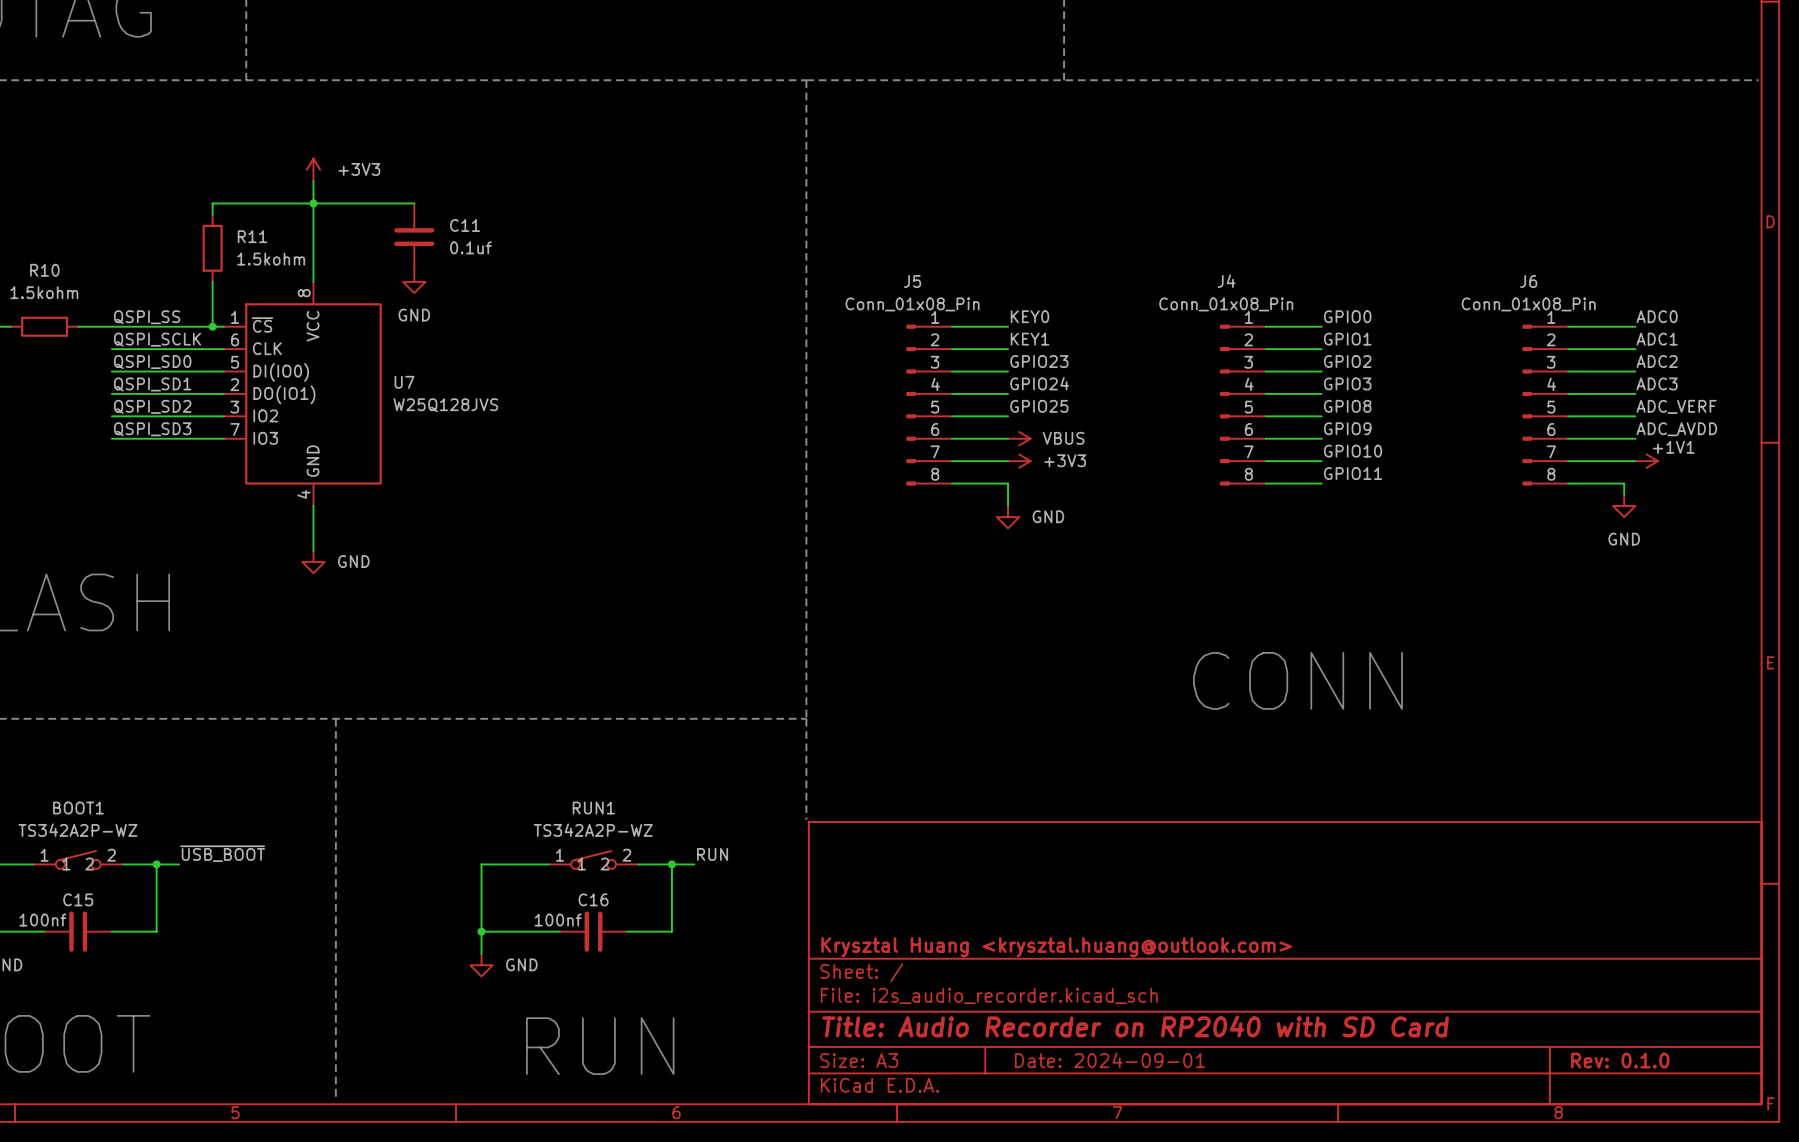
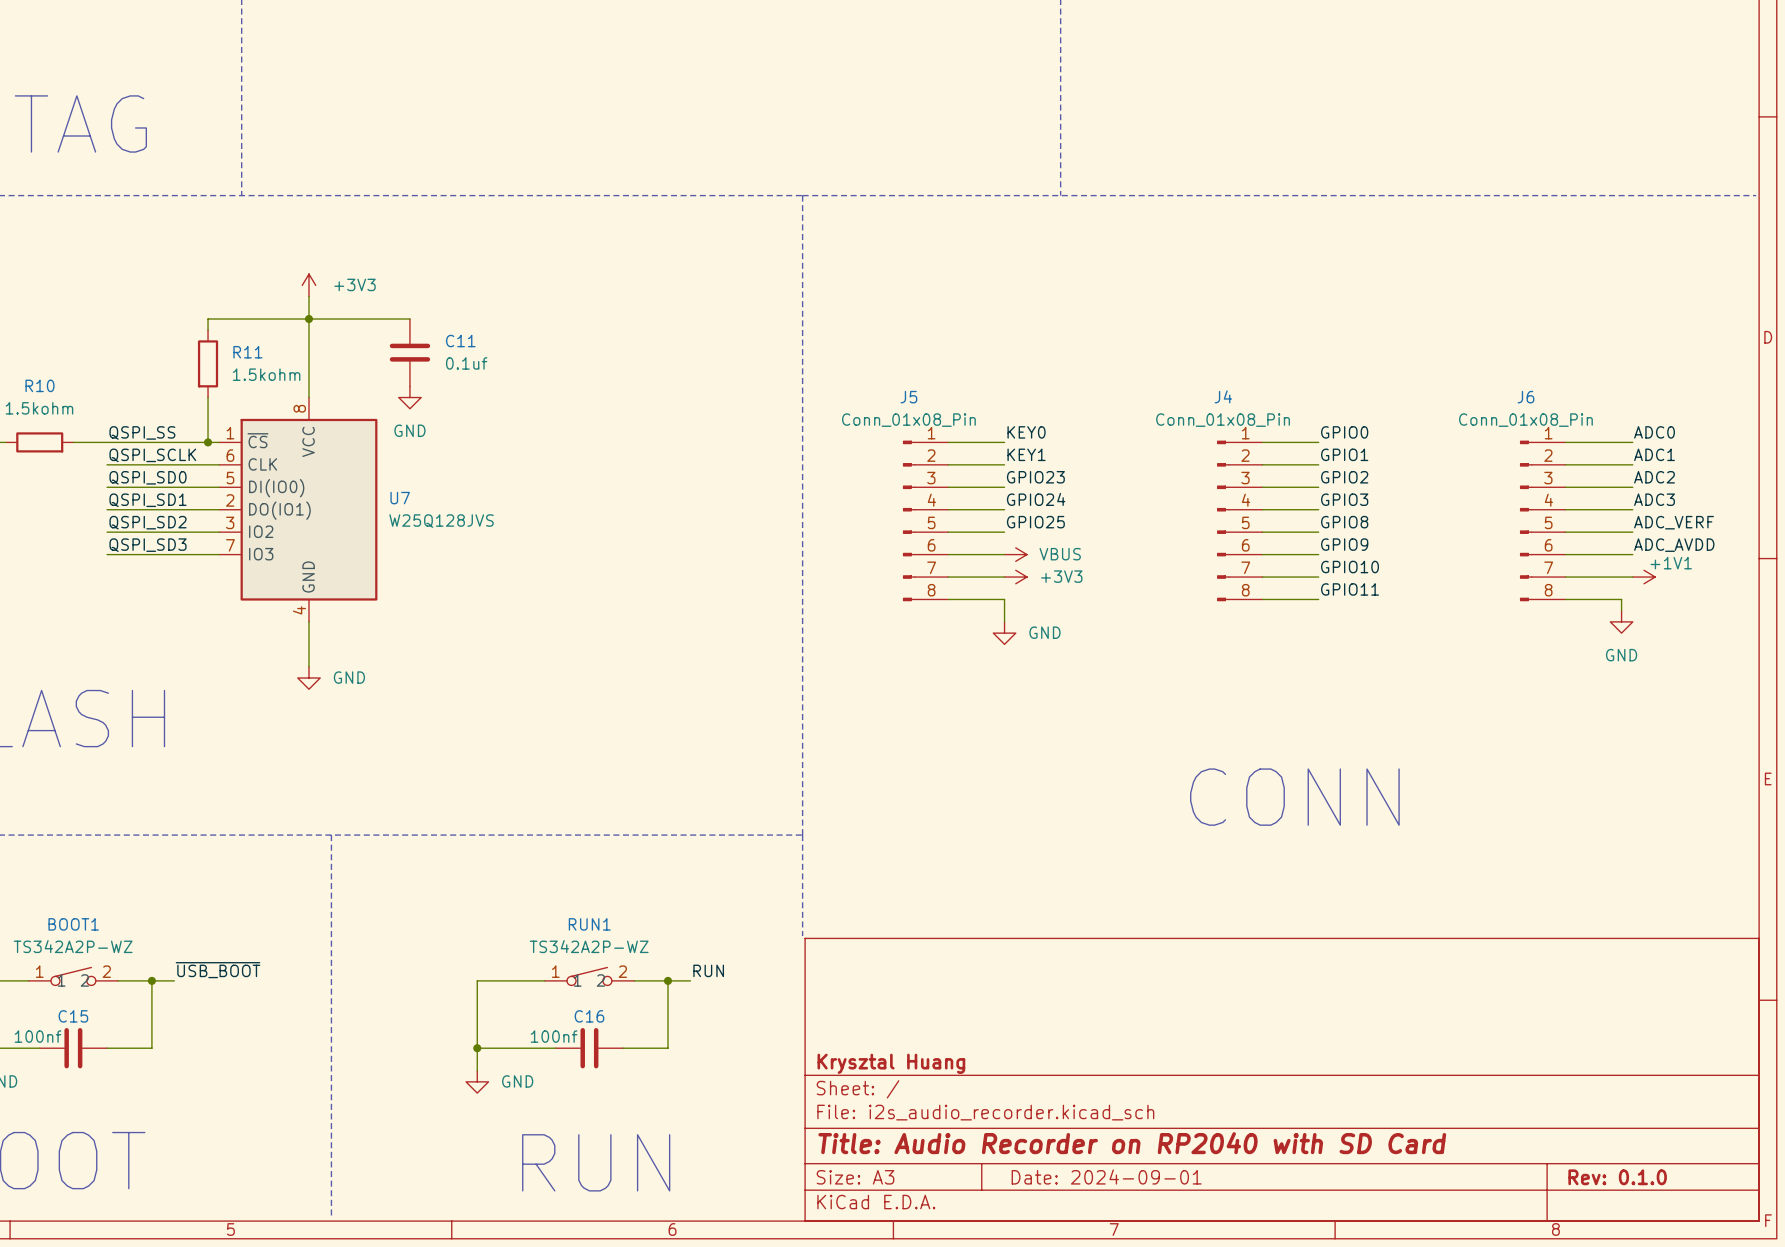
title block: Krysztal Huang <krysztal.huang@outlook.com> (1056, 947) -> Krysztal Huang (891, 1063)

